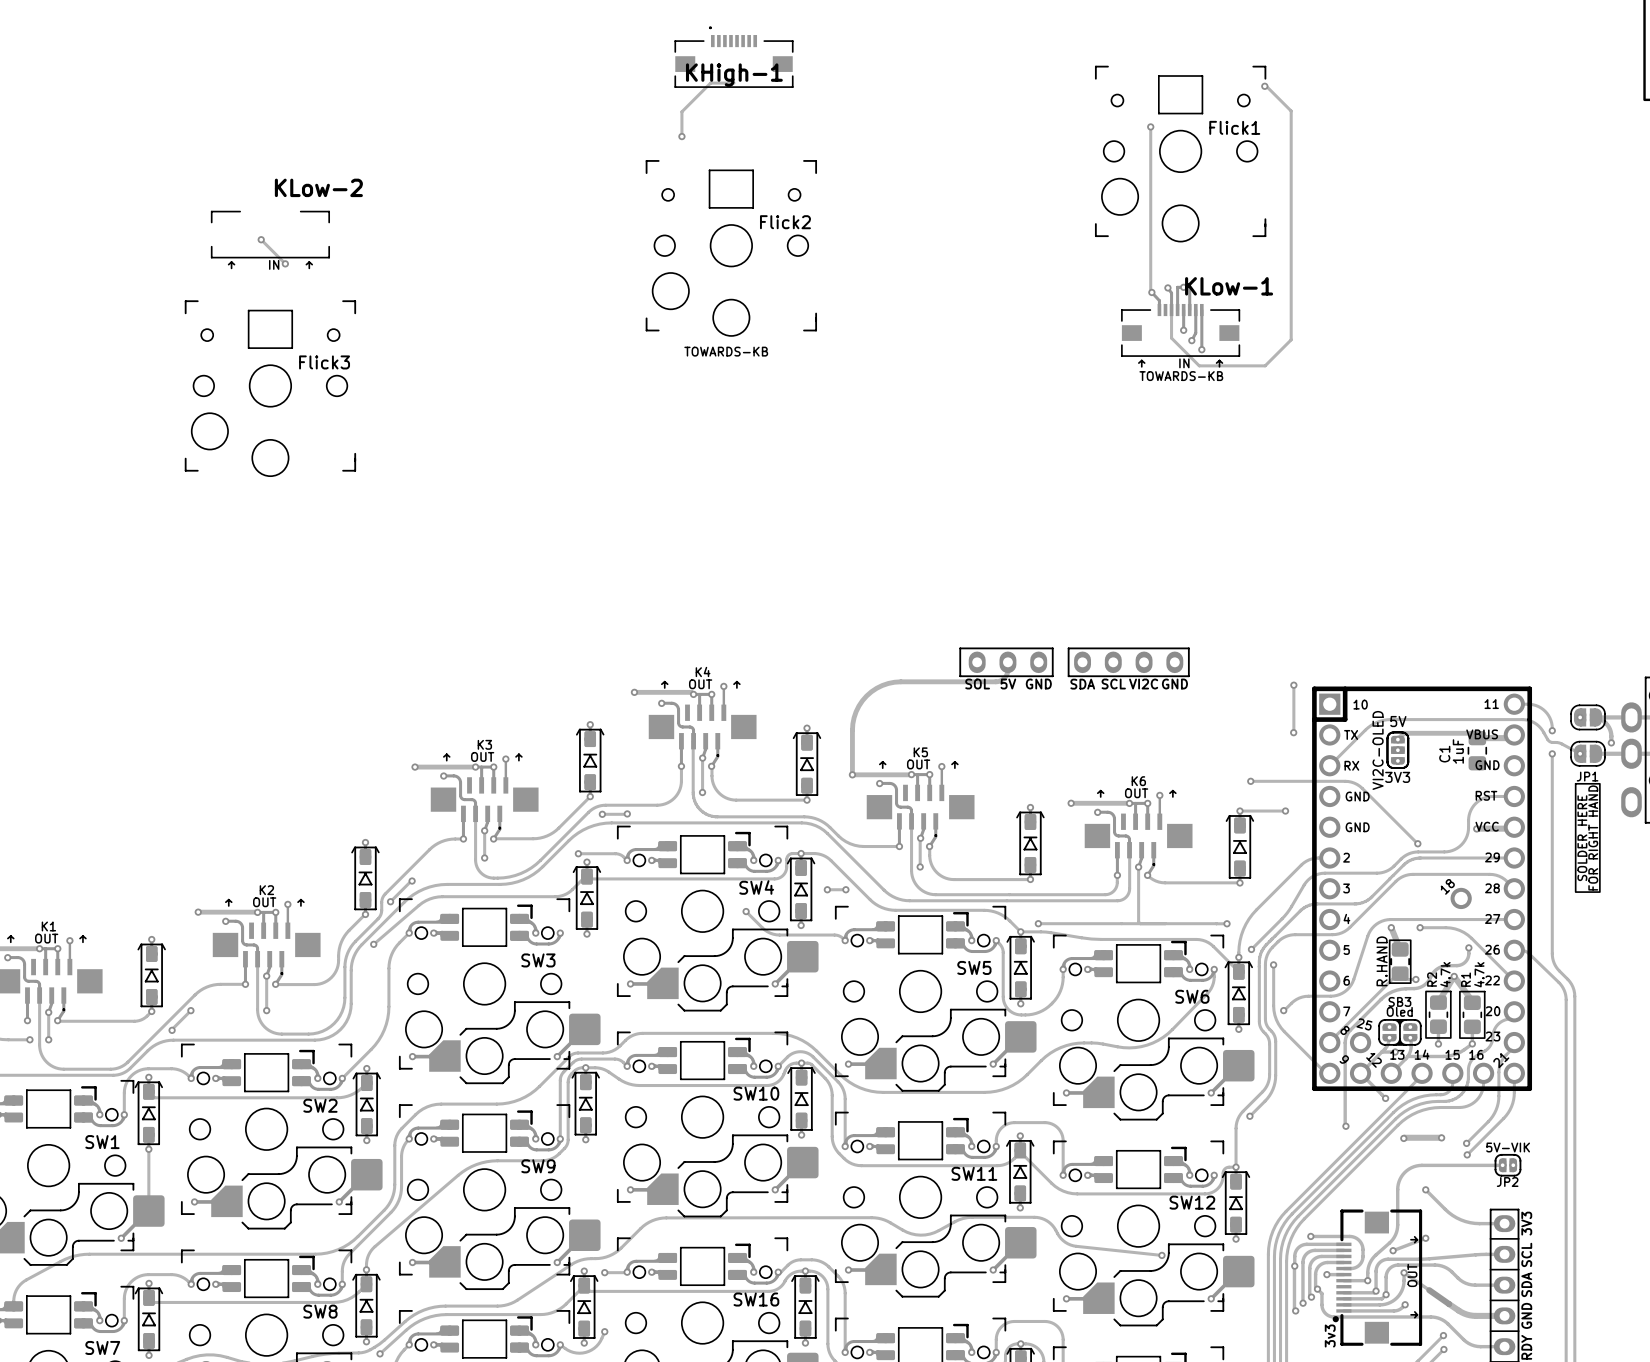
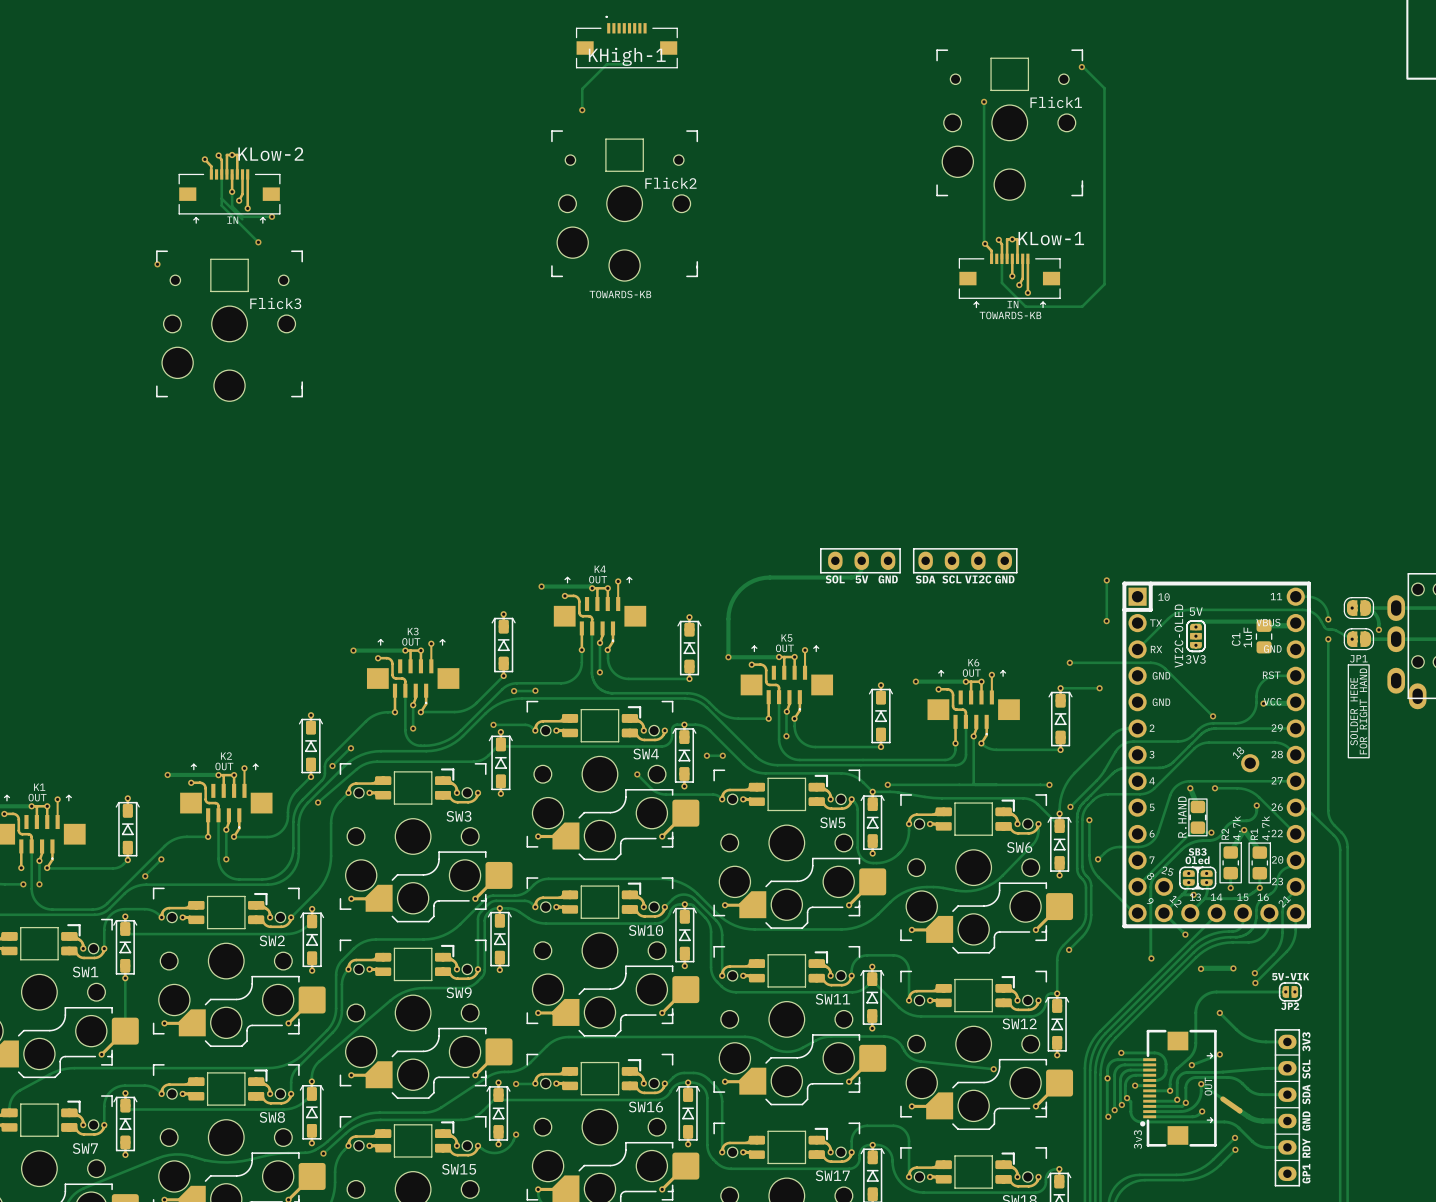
KLow-2 footprint: [211, 210, 330, 269] -> [178, 151, 281, 224]
track: none -> (221, 174) (221, 205) (258, 242)
track: none -> (232, 191) (232, 206) (242, 216) (271, 216)
via: (261, 239) -> none
via: none -> (271, 216)
via: (285, 263) -> none
via: none -> (258, 242)
via: none -> (157, 264)

